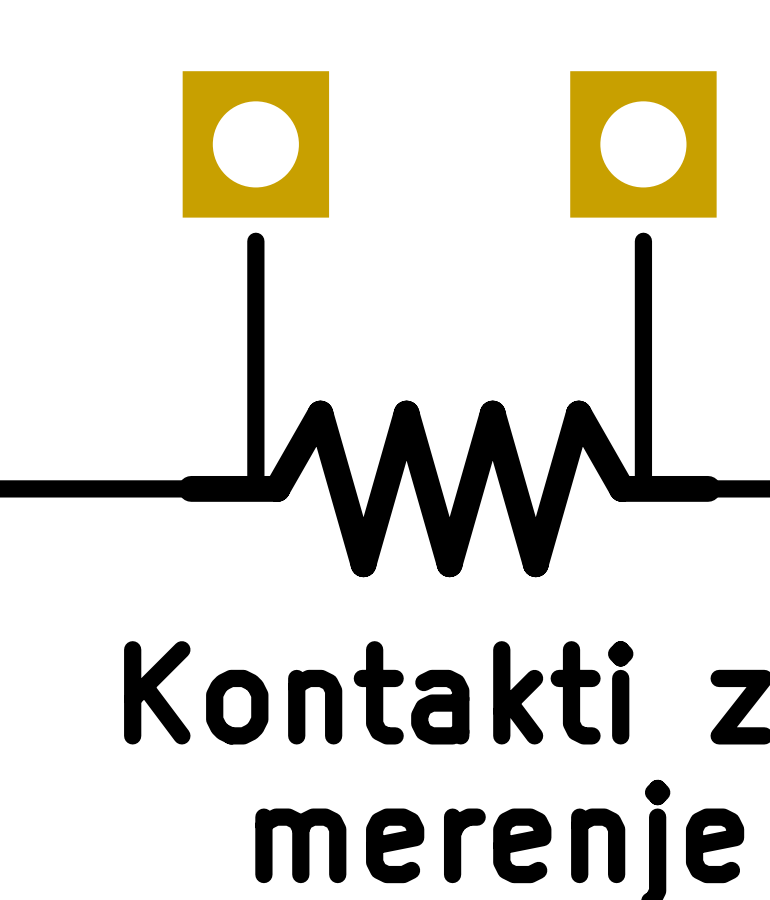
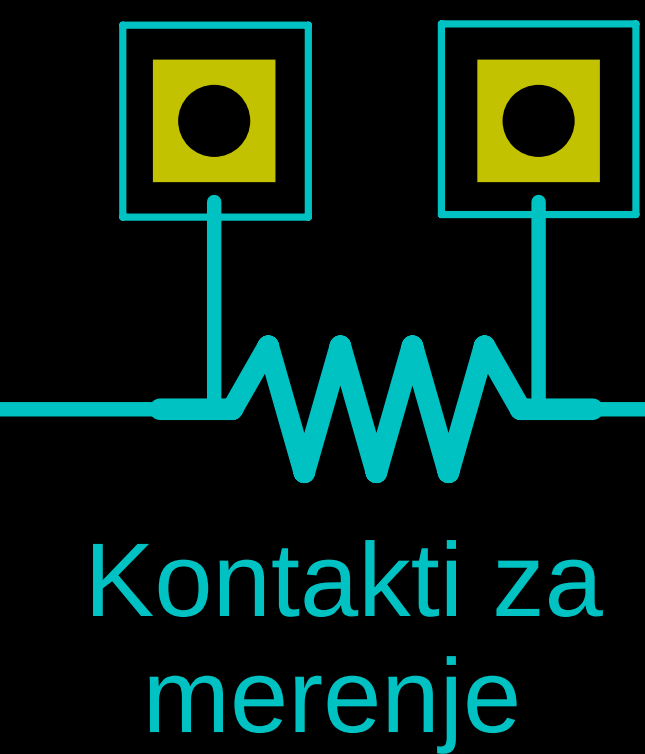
line: none -> (635, 23) (441, 23) (441, 214) (635, 214) (635, 23)
line: none -> (308, 25) (122, 25) (122, 217) (308, 217) (308, 25)

